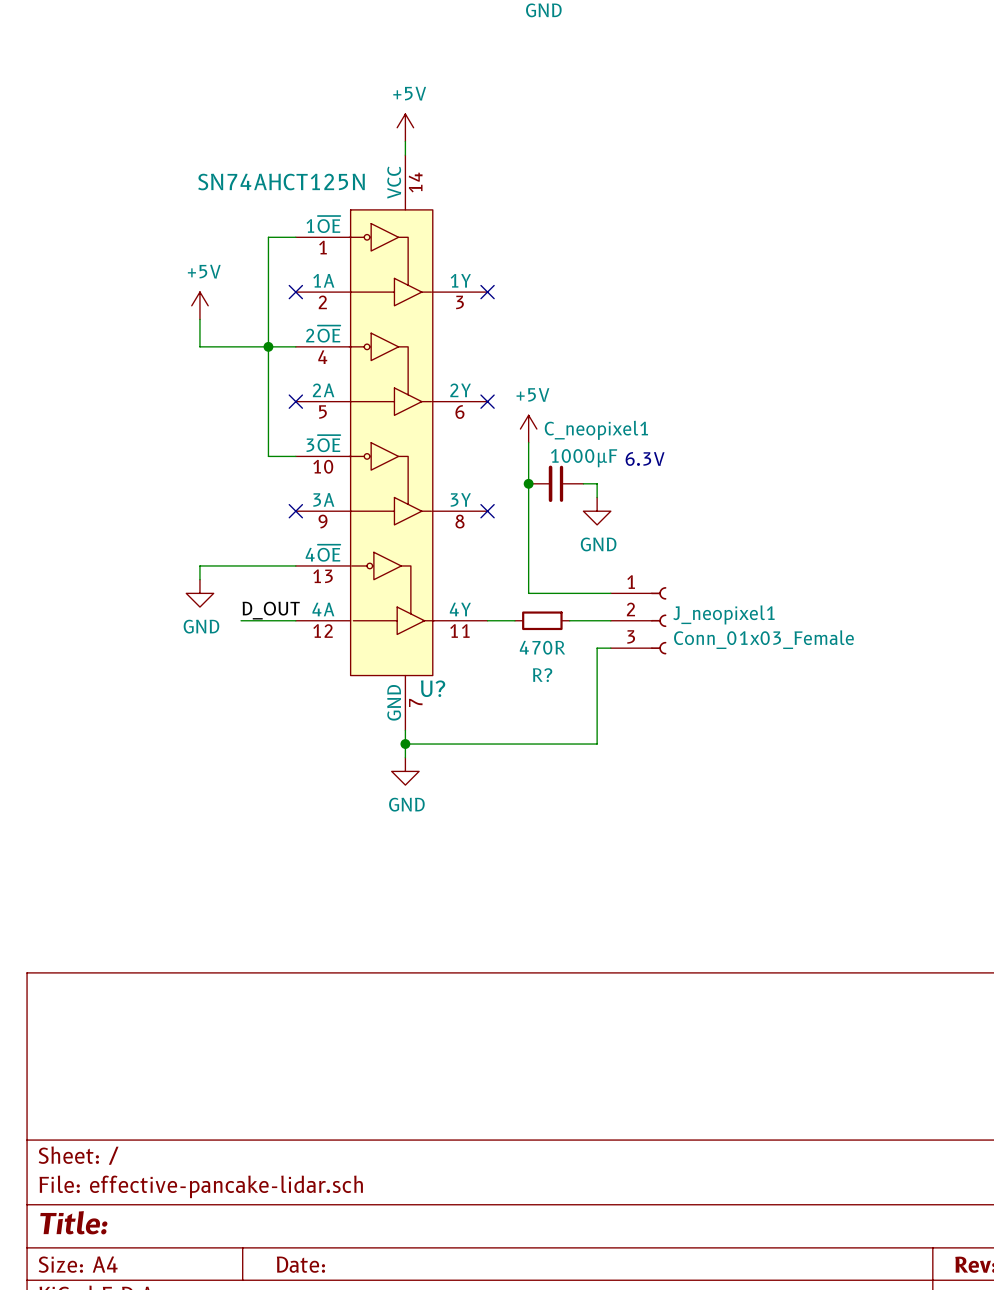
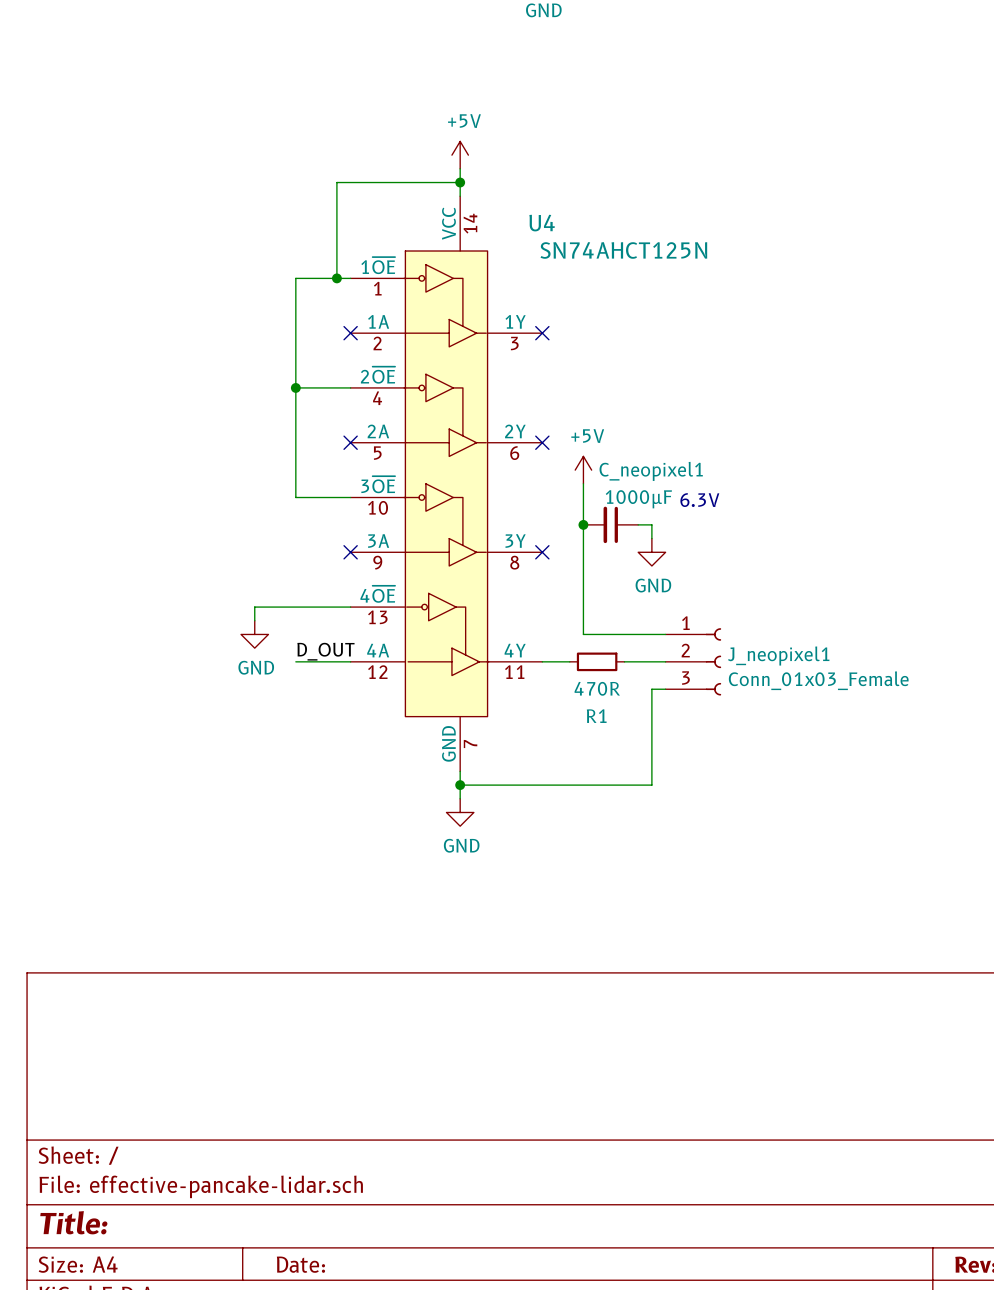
power symbol position: +5V (405, 127) -> +5V (460, 155)
wire: (405, 141) (405, 155) -> none
wire: none -> (460, 168) (460, 196)
wire: none -> (460, 182) (336, 182) (336, 278)
junction: none -> (460, 182)
wire: (295, 237) (268, 237) (268, 456) (295, 456) -> none
junction: none -> (336, 278)
wire: none -> (350, 278) (295, 278) (295, 497) (350, 497)
no-connect mark: (295, 292) -> none
no-connect mark: (487, 292) -> none
power symbol: +5V (199, 305) -> none
wire: (199, 319) (199, 346) (295, 346) -> none
no-connect mark: none -> (350, 333)
no-connect mark: none -> (542, 333)
junction: (268, 346) -> none
wire: none -> (295, 387) (350, 387)
junction: none -> (295, 387)
no-connect mark: (295, 401) -> none
no-connect mark: (487, 401) -> none
power symbol position: +5V (528, 429) -> +5V (583, 470)
no-connect mark: none -> (350, 442)
U?: SN74AHCT125N (391, 442) -> none
wire: (528, 442) (528, 593) (610, 593) -> none
no-connect mark: none -> (542, 442)
text position: 6.3V (645, 458) -> 6.3V (699, 500)
U4: none -> SN74AHCT125N (446, 483)
junction: (528, 483) -> none
C_neopixel1 position: (556, 483) -> (610, 524)
wire: (583, 483) (597, 483) (597, 497) -> (583, 483) (583, 634) (665, 634)
no-connect mark: (295, 511) -> none
no-connect mark: (487, 511) -> none
power symbol position: GND (597, 511) -> GND (651, 552)
junction: none -> (583, 524)
wire: none -> (638, 524) (651, 524) (651, 538)
no-connect mark: none -> (350, 552)
no-connect mark: none -> (542, 552)
wire: (295, 565) (199, 565) (199, 579) -> (350, 607) (254, 607) (254, 620)
power symbol position: GND (199, 593) -> GND (254, 634)
label position: D_OUT (271, 610) -> D_OUT (325, 651)
wire: (241, 620) (295, 620) -> (295, 661) (350, 661)
wire: (487, 620) (514, 620) -> (542, 661) (569, 661)
R?: 470R (542, 620) -> none
wire: (569, 620) (610, 620) -> (624, 661) (665, 661)
J_neopixel1 position: (638, 620) -> (693, 661)
wire: (610, 648) (597, 648) (597, 744) (405, 744) -> (665, 689) (651, 689) (651, 785) (460, 785)
R1: none -> 470R (597, 661)
wire: (405, 730) (405, 757) -> (460, 771) (460, 798)
junction: (405, 744) -> none
power symbol position: GND (405, 771) -> GND (460, 812)
junction: none -> (460, 785)

